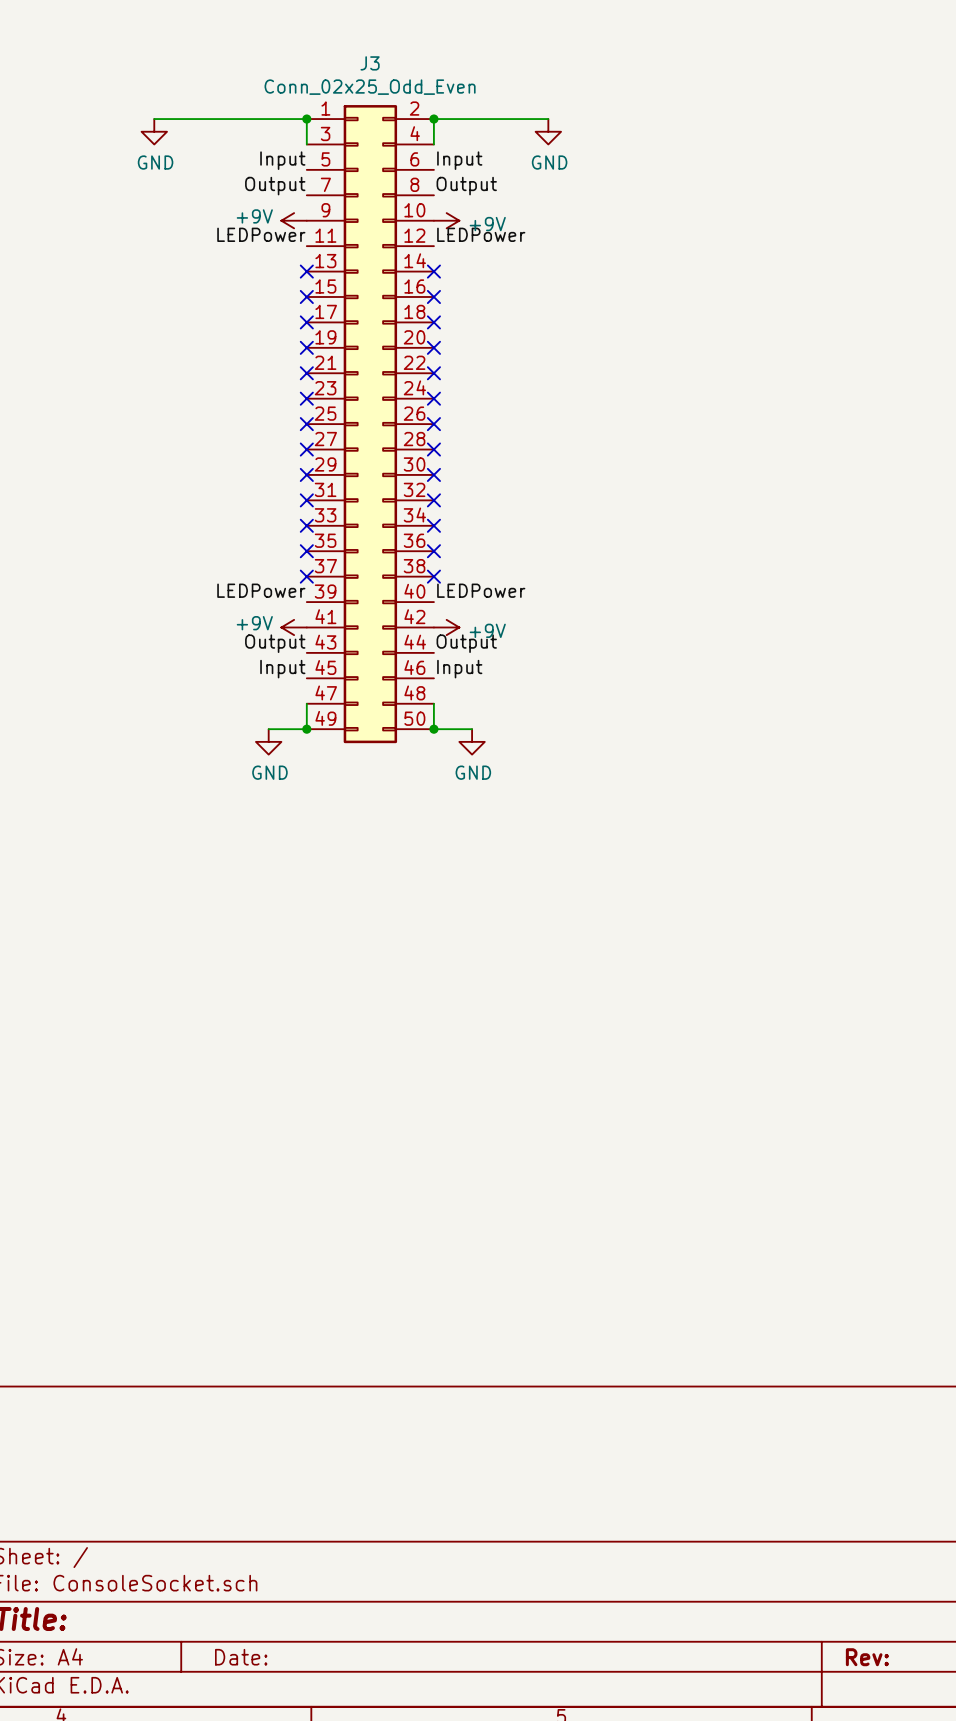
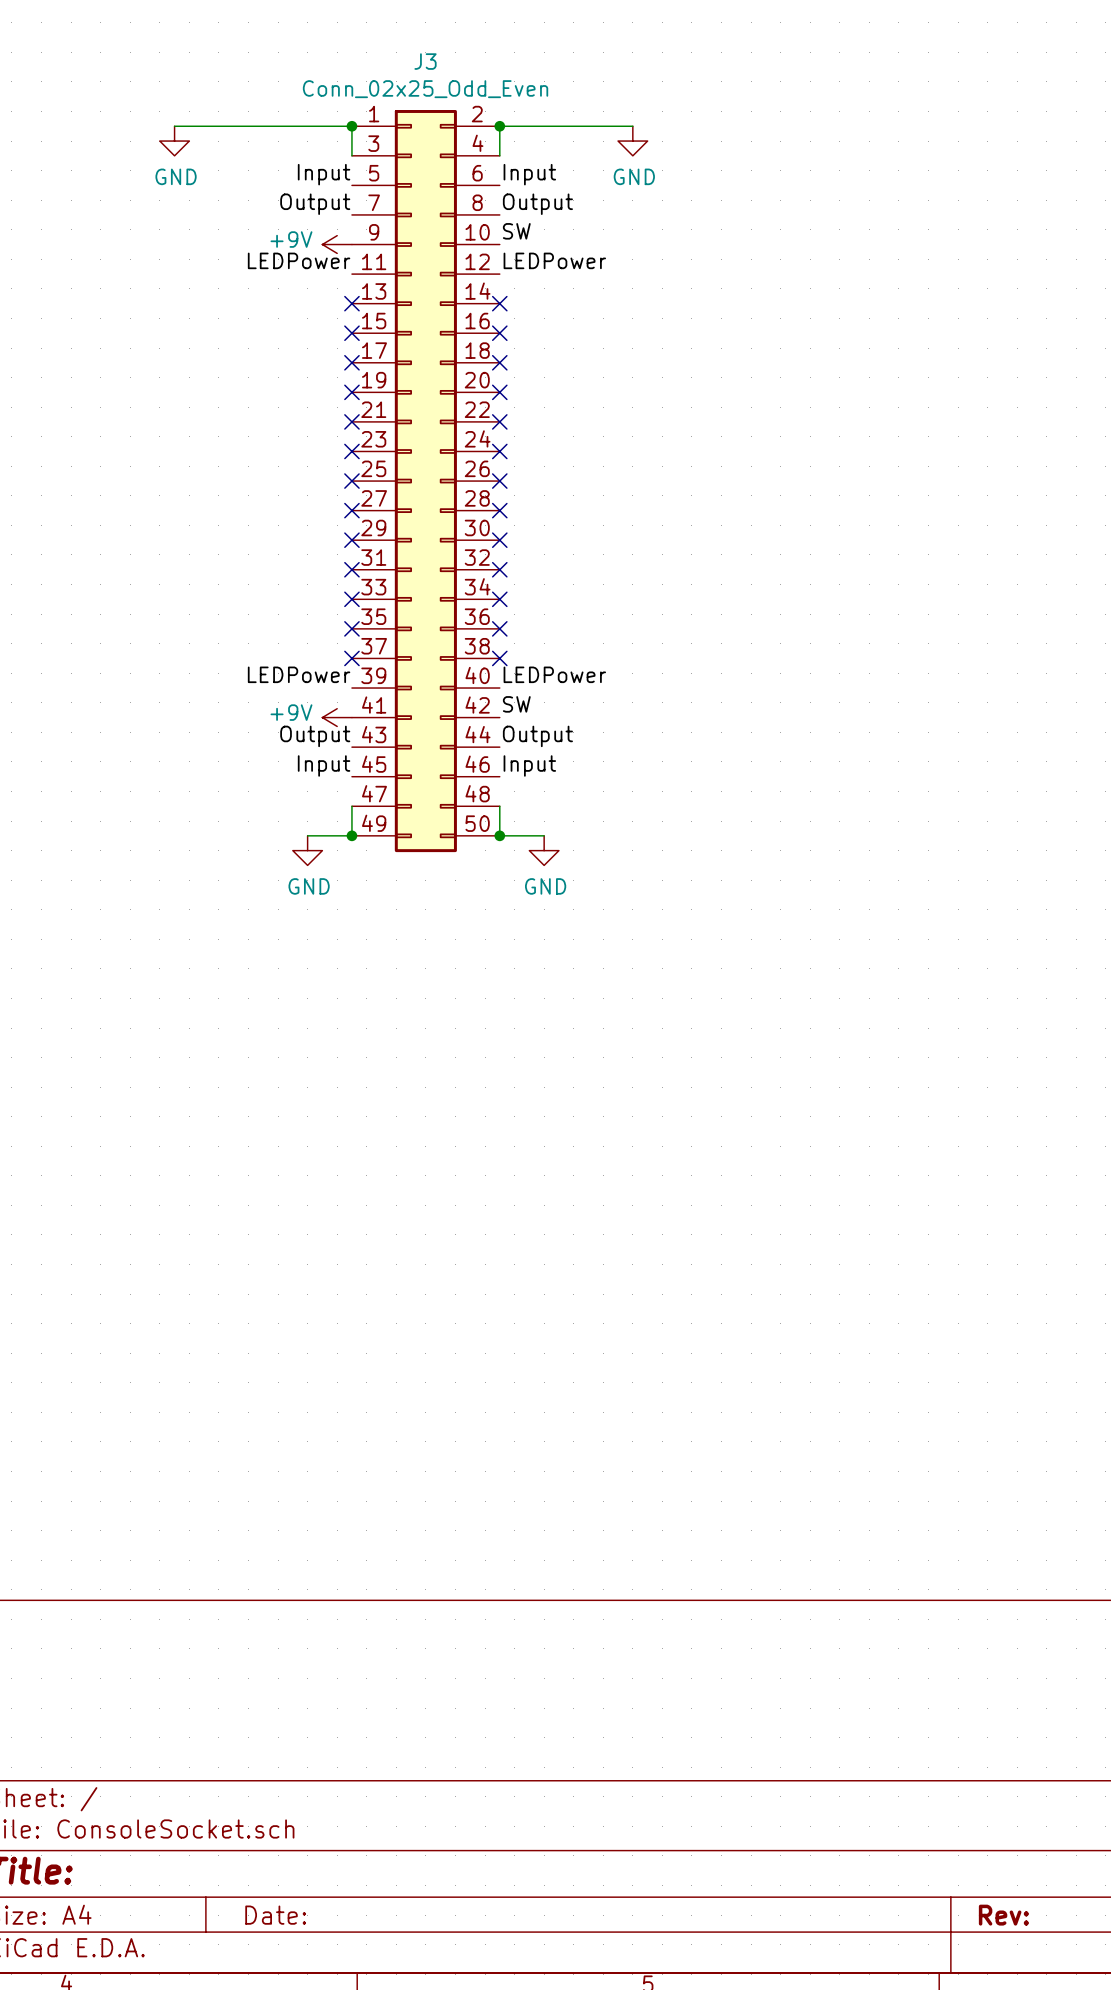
label: none -> SW (516, 231)
power symbol: +9V (446, 220) -> none
label: none -> SW (516, 704)
power symbol: +9V (446, 627) -> none

